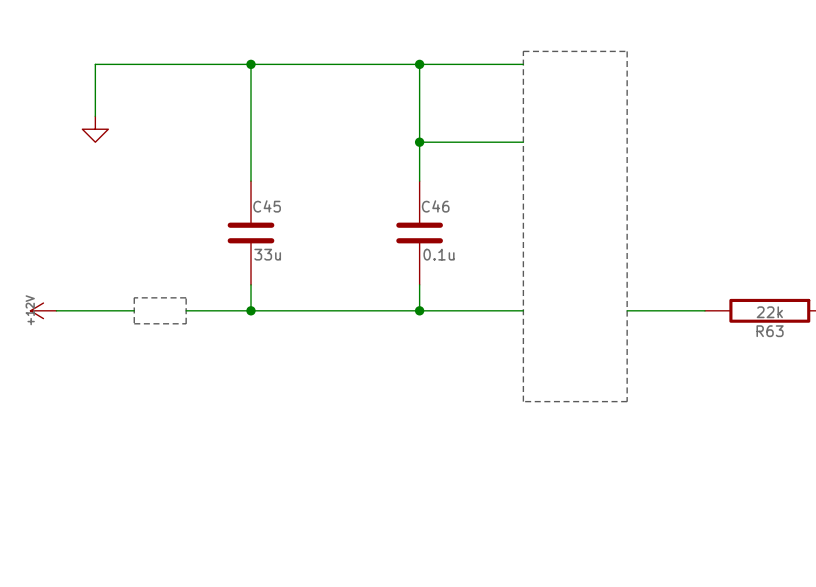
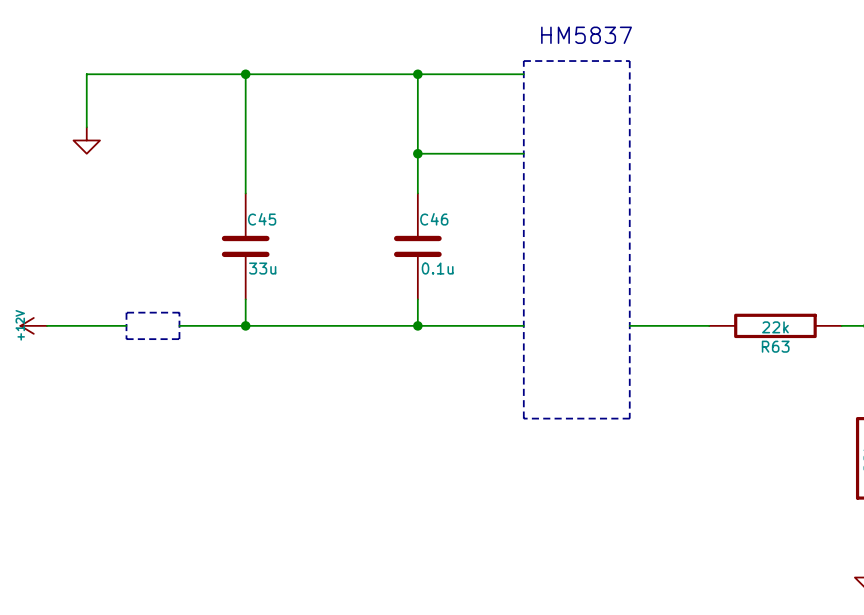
text: none -> HM5837 (586, 35)

